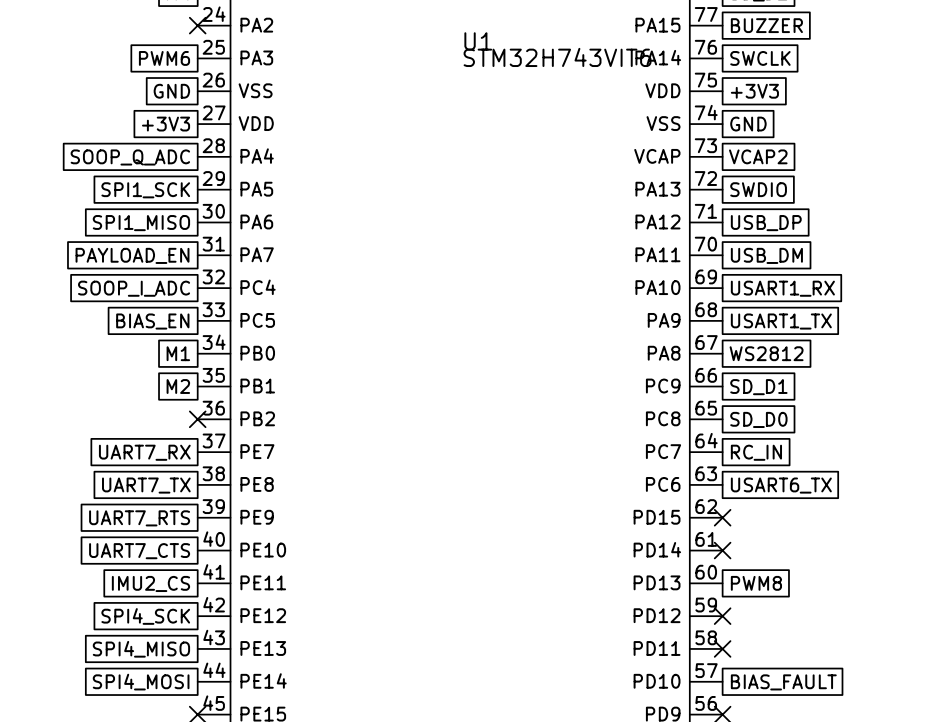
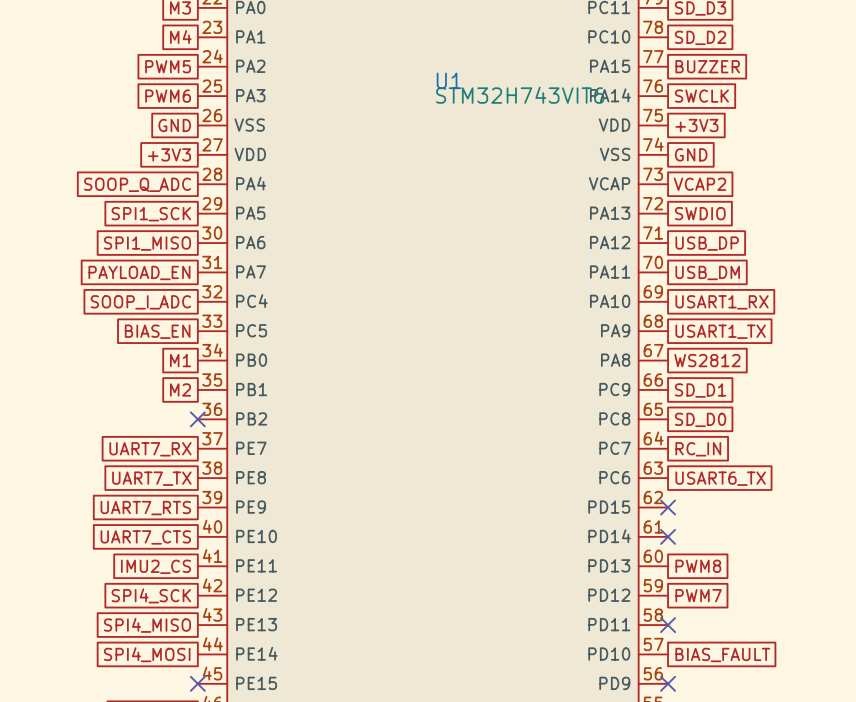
global label: none -> PWM5 (168, 66)
no-connect mark: (197, 25) -> none
no-connect mark: (722, 616) -> none
global label: none -> PWM7 (698, 595)

